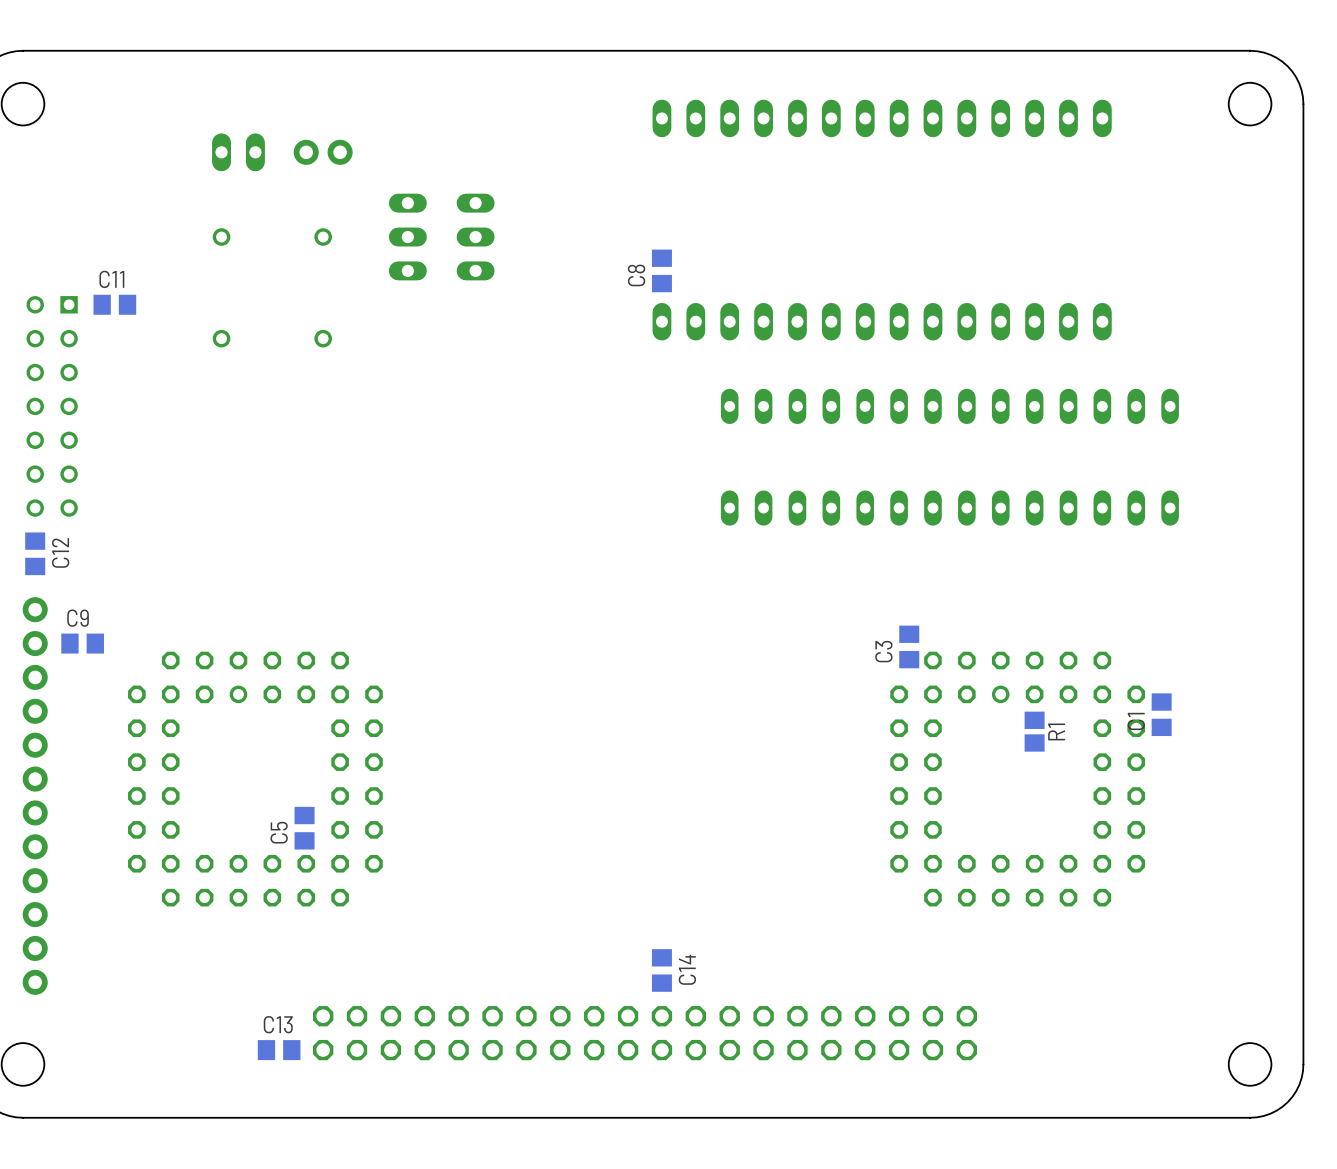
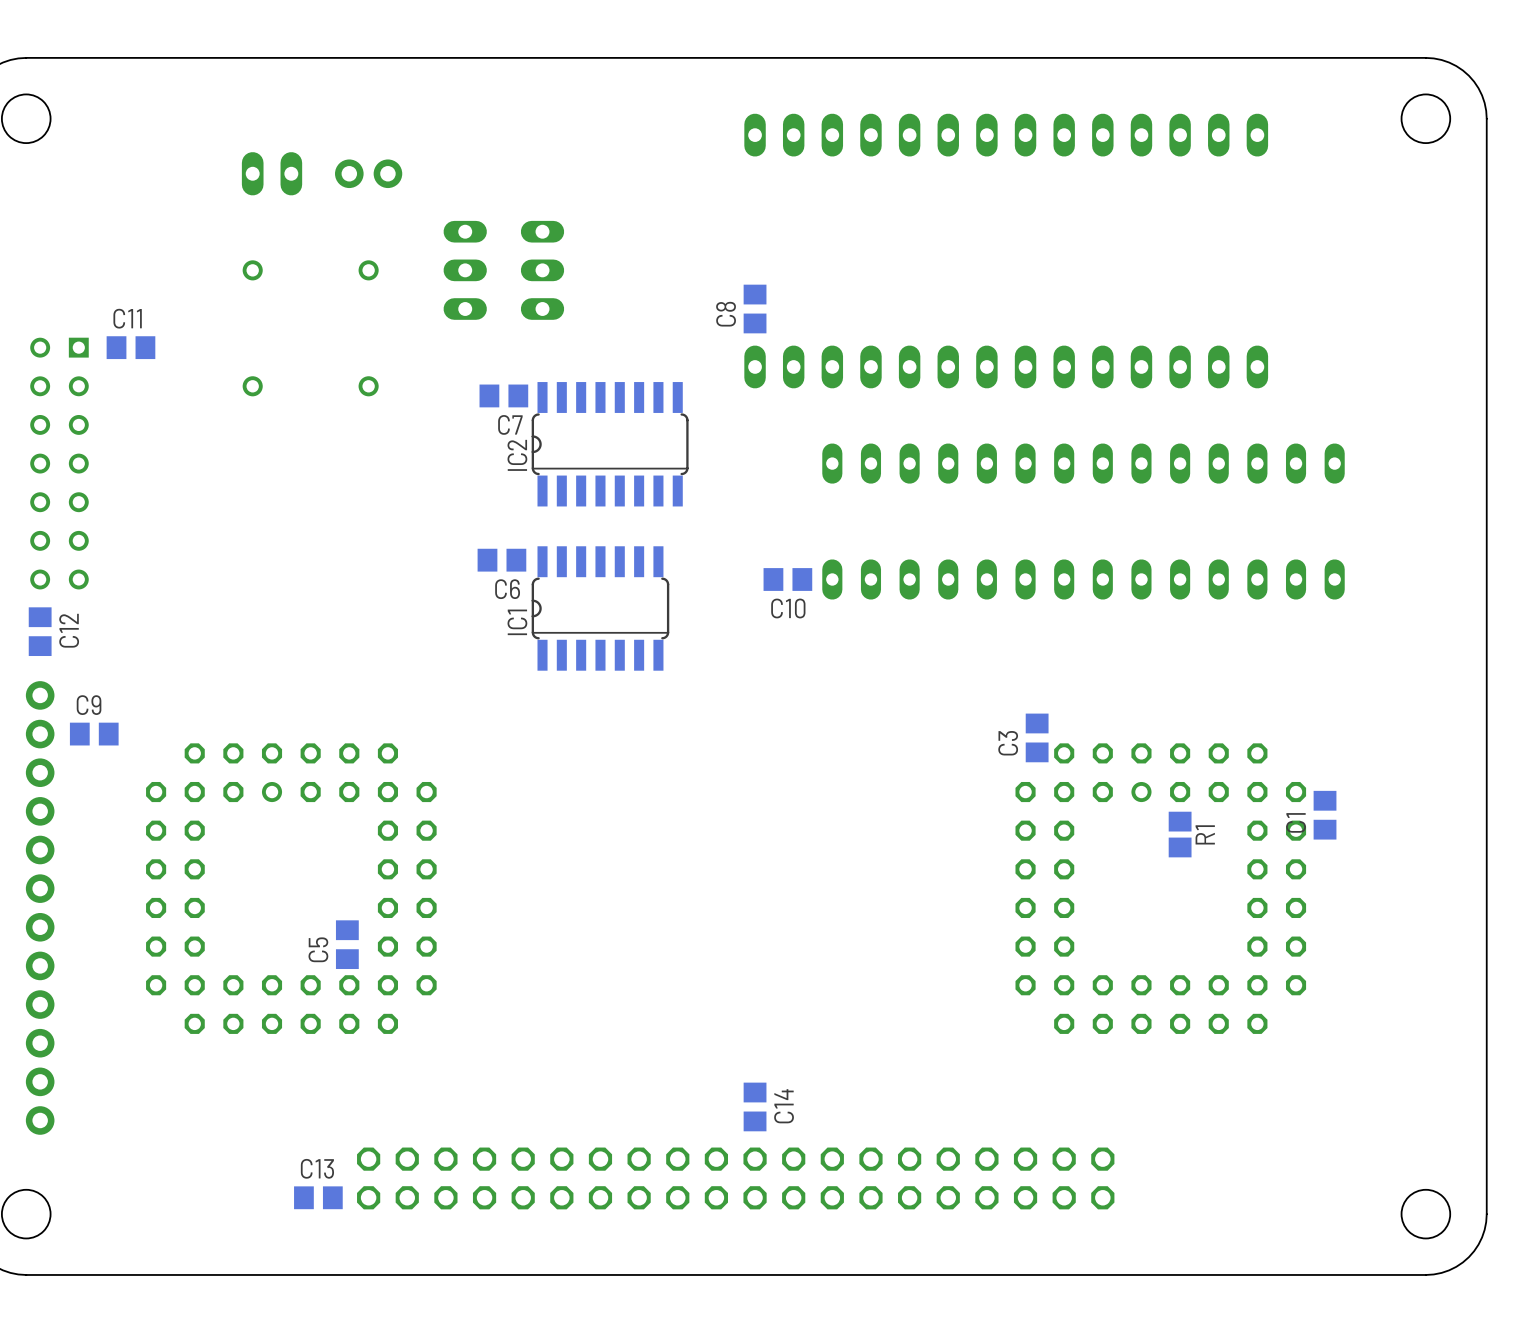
C7: none -> (503, 395)
IC2: none -> (610, 444)
C6: none -> (501, 560)
C10: none -> (787, 579)
IC1: none -> (600, 608)

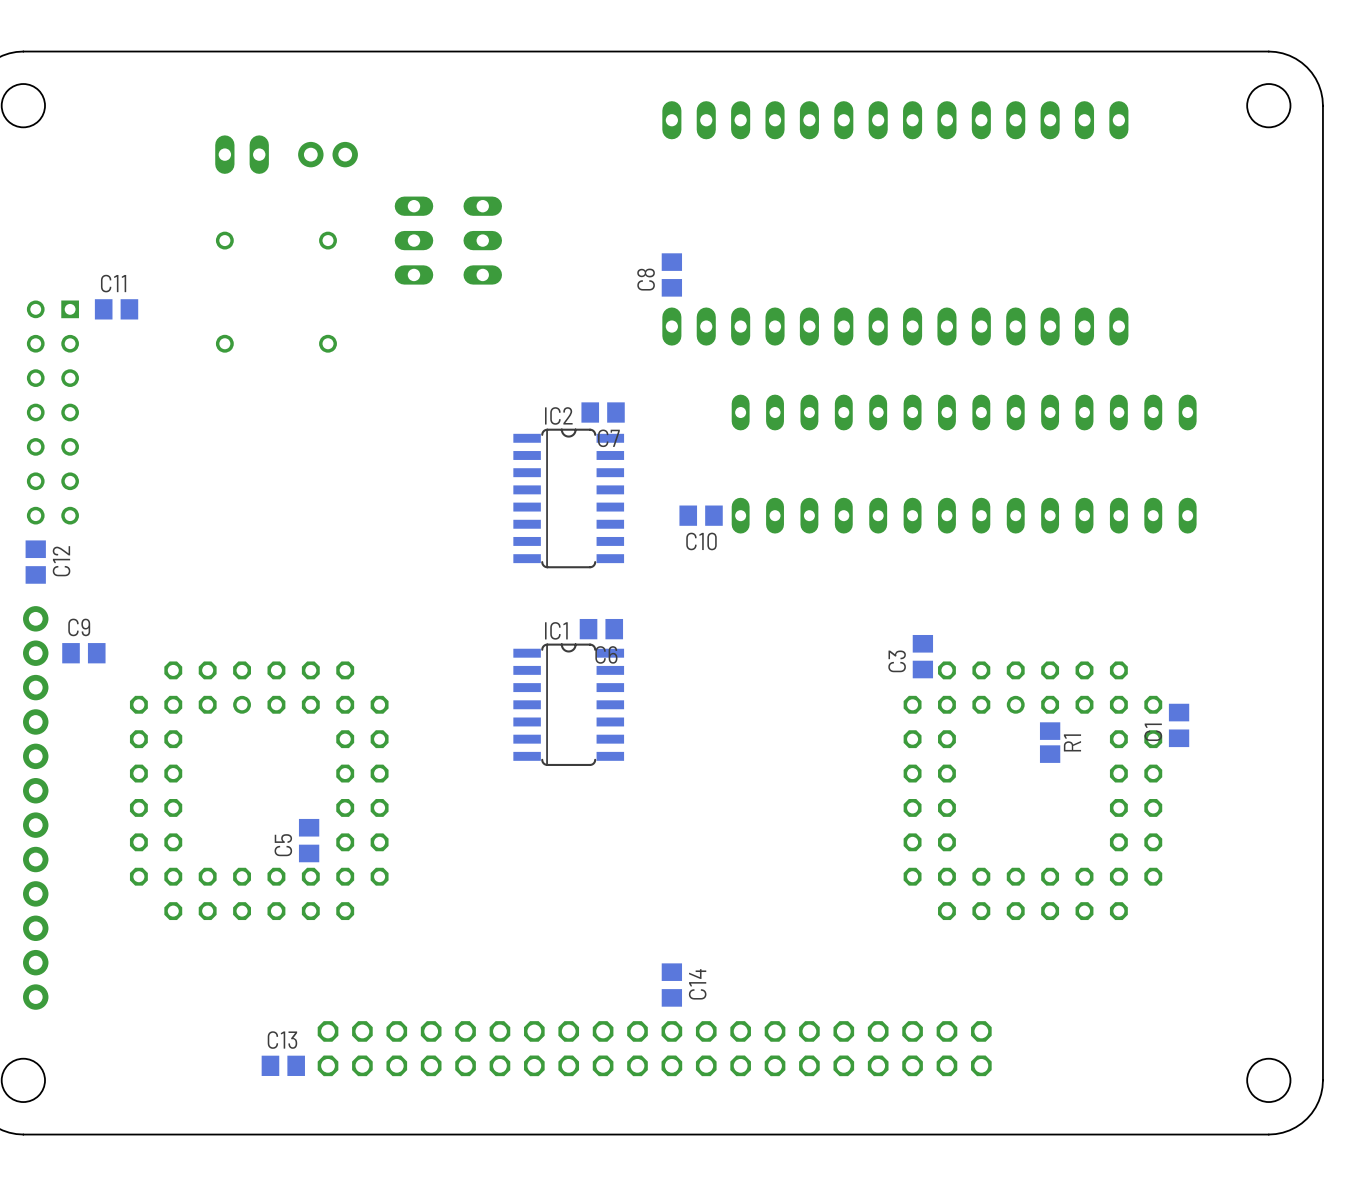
C7 position: (503, 395) -> (603, 412)
IC2 rotation: 0° (610, 444) -> 90° clockwise (568, 498)
IC2 position: (610, 444) -> (568, 498)
C6 position: (501, 560) -> (601, 629)
IC1 rotation: 0° (600, 608) -> 90° clockwise (568, 704)
IC1 position: (600, 608) -> (568, 704)

